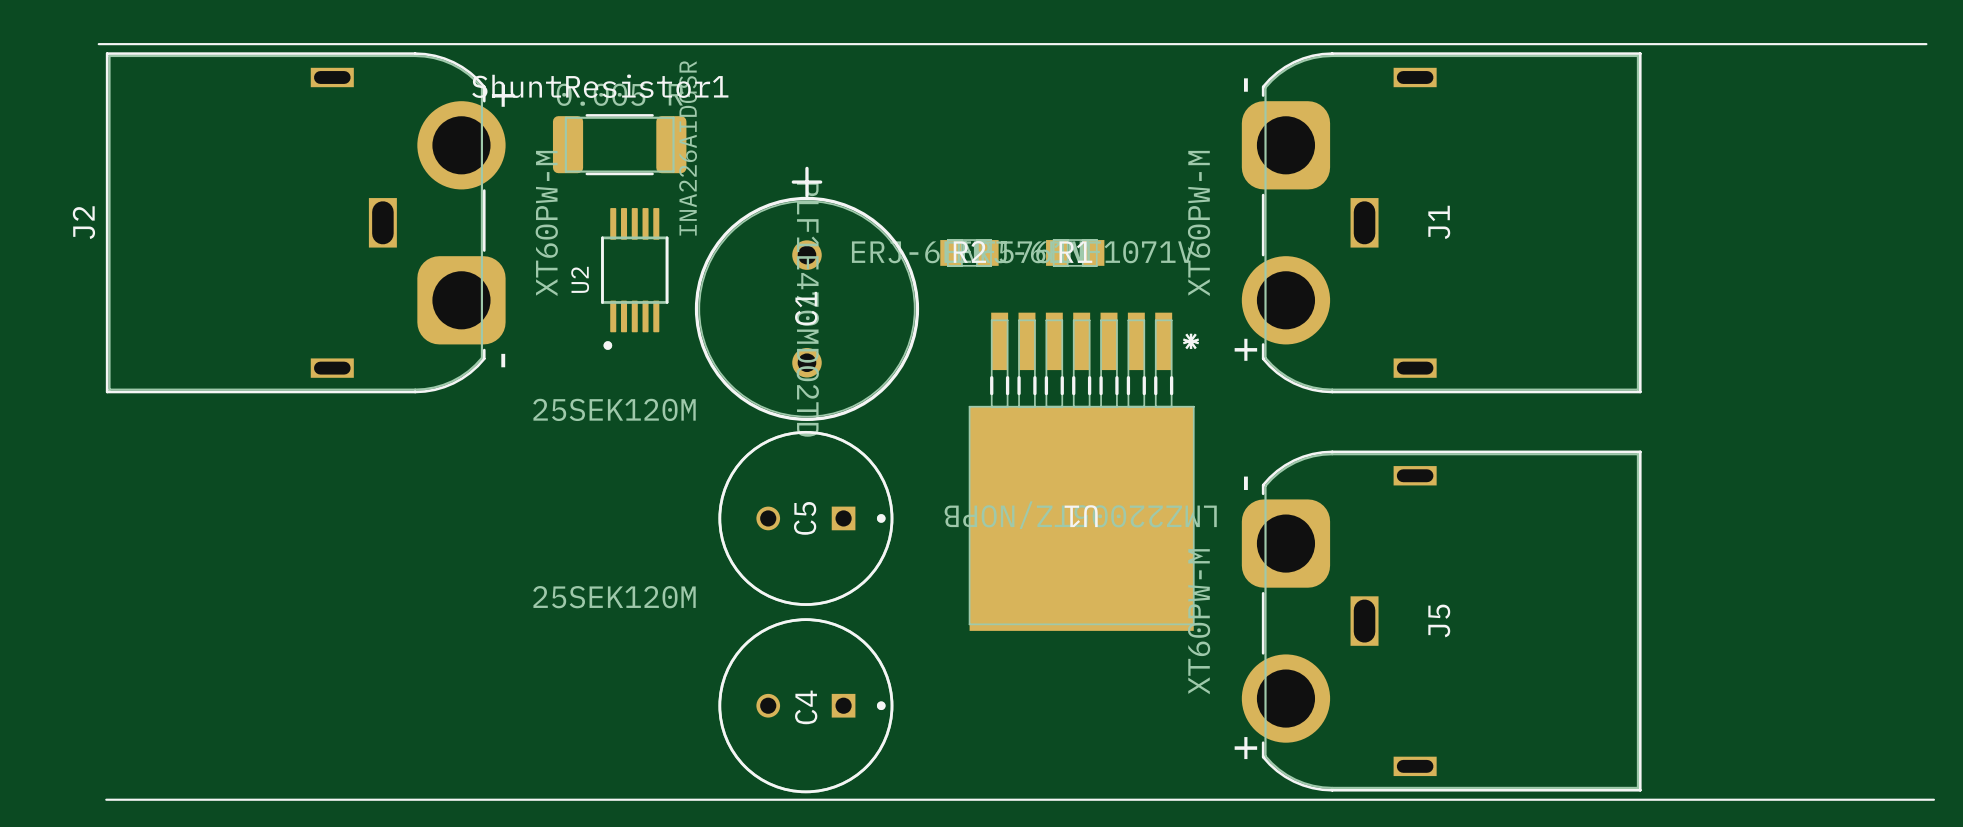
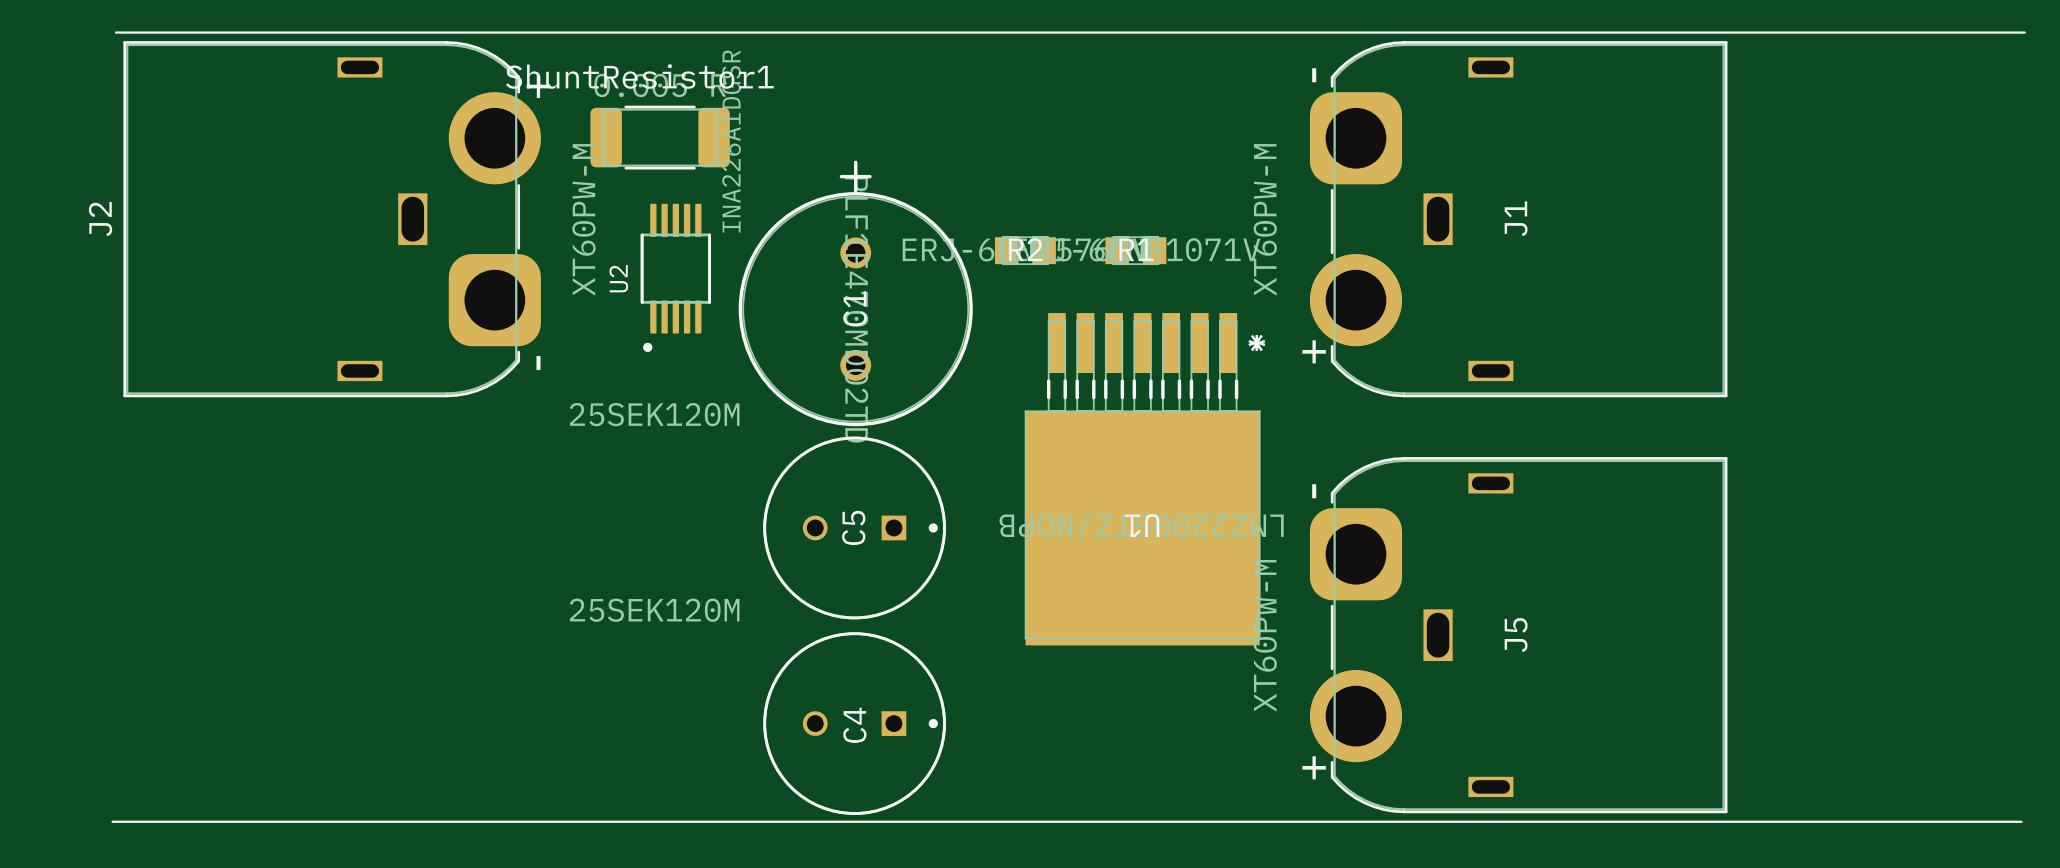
line: none -> (112, 821) (123, 821)
line: (1923, 799) (1933, 799) -> none

